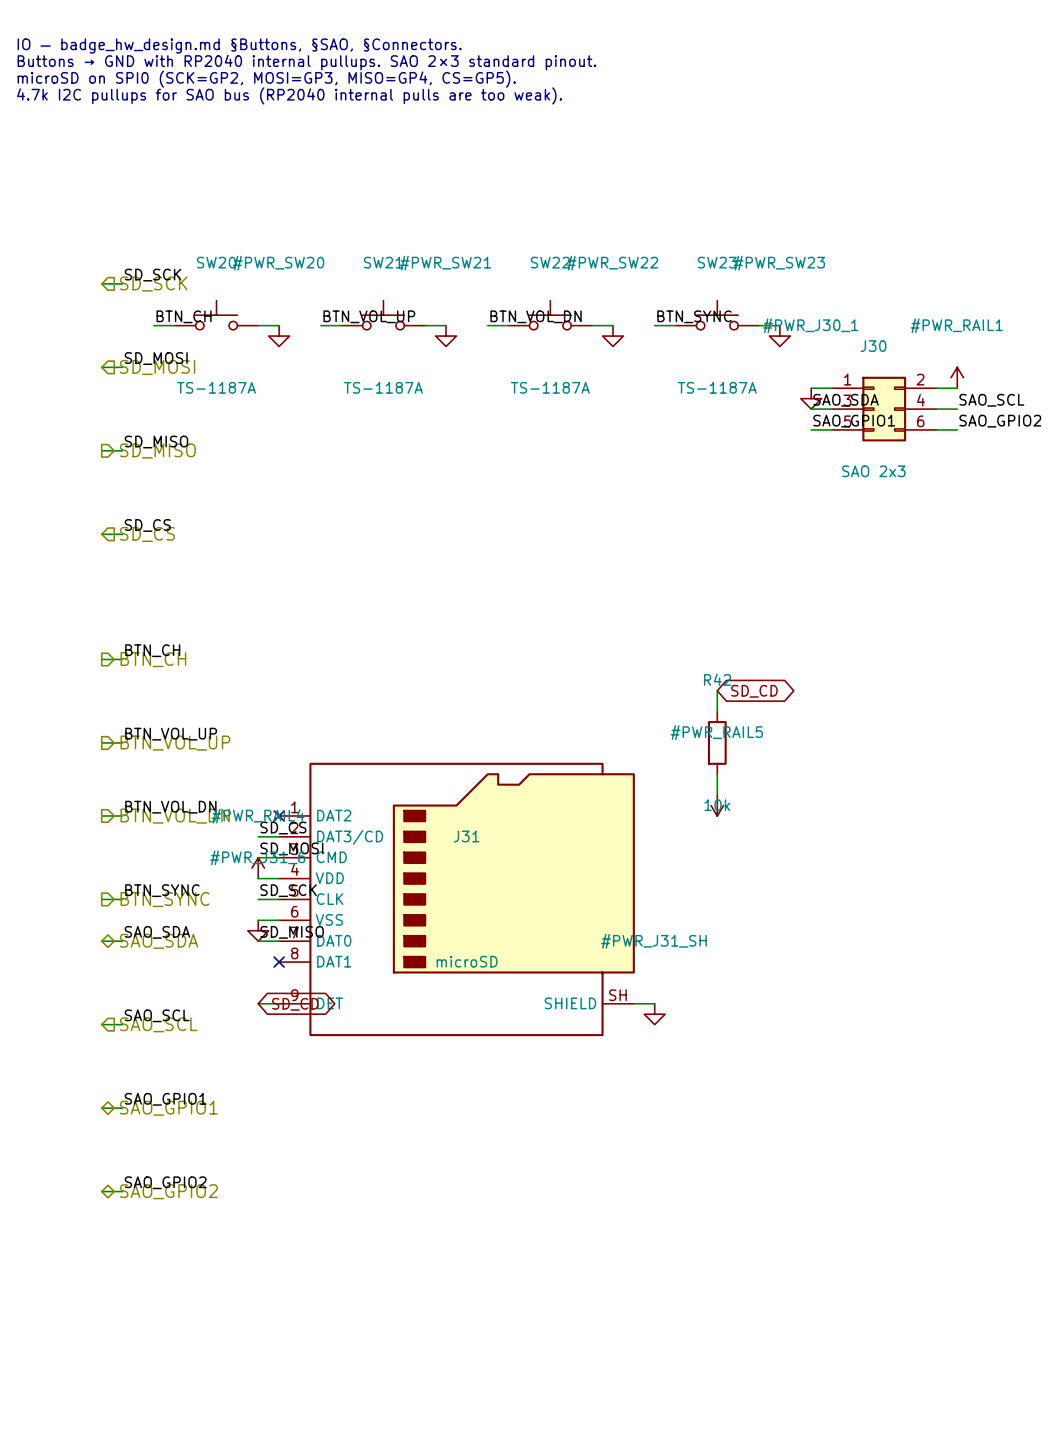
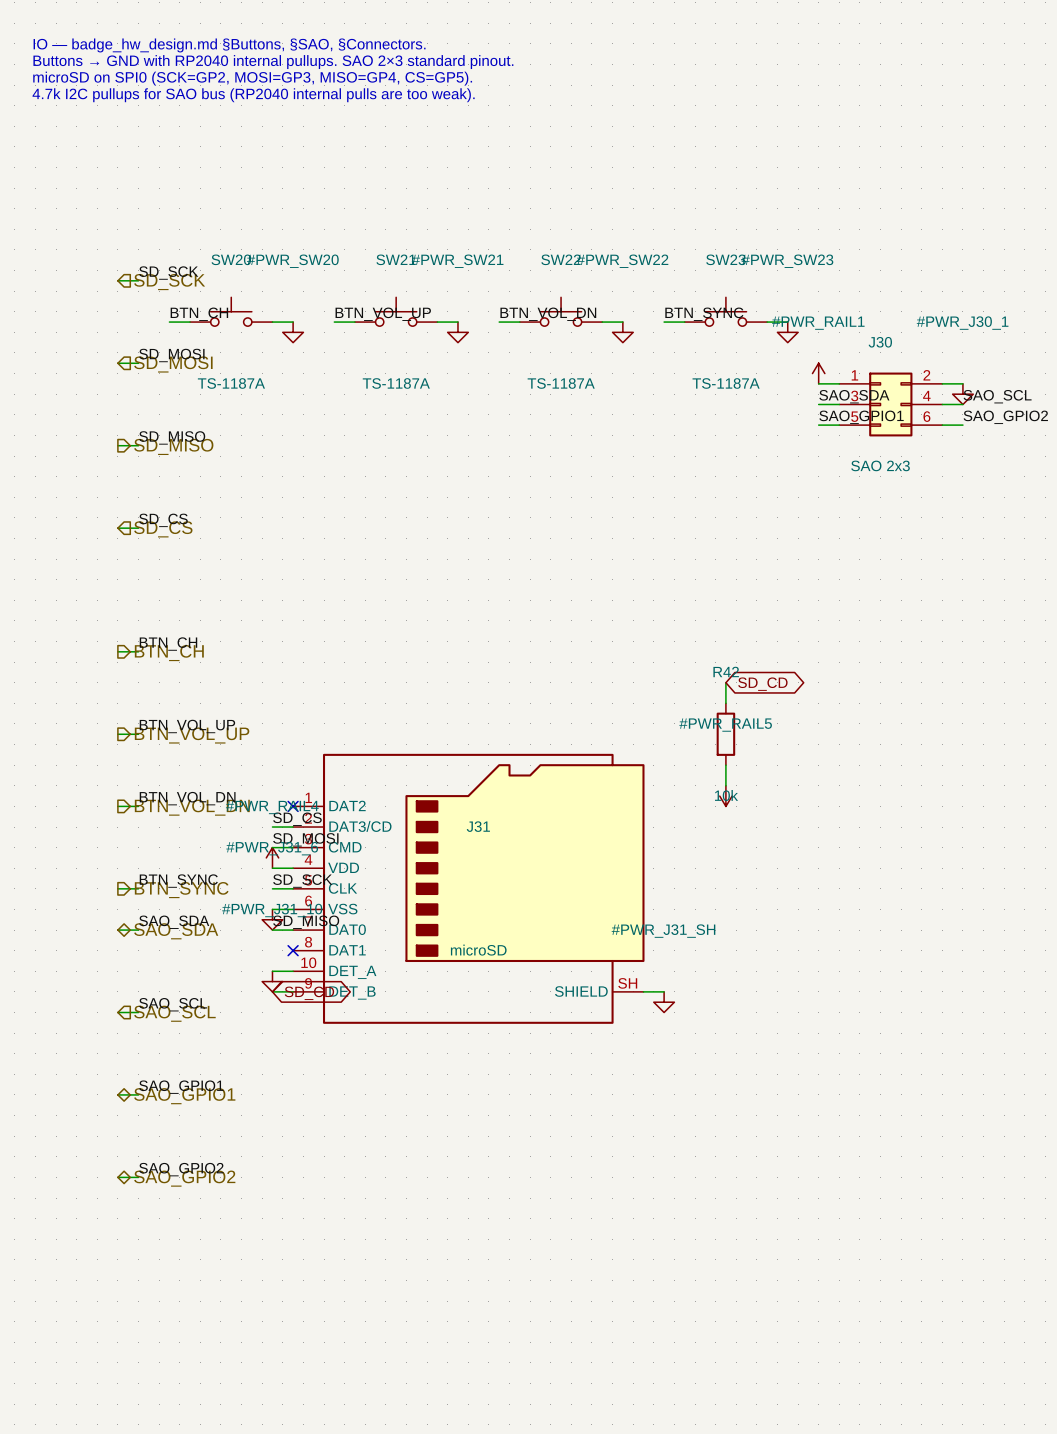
#PWR_RAIL1 position: (957, 377) -> (818, 373)
#PWR_J30_1 position: (811, 398) -> (962, 394)
J31 symbol: [279, 762, 635, 1037] -> [293, 753, 645, 1024]
wire: none -> (272, 971) (293, 971)
#PWR_J31_10: none -> (272, 981)

